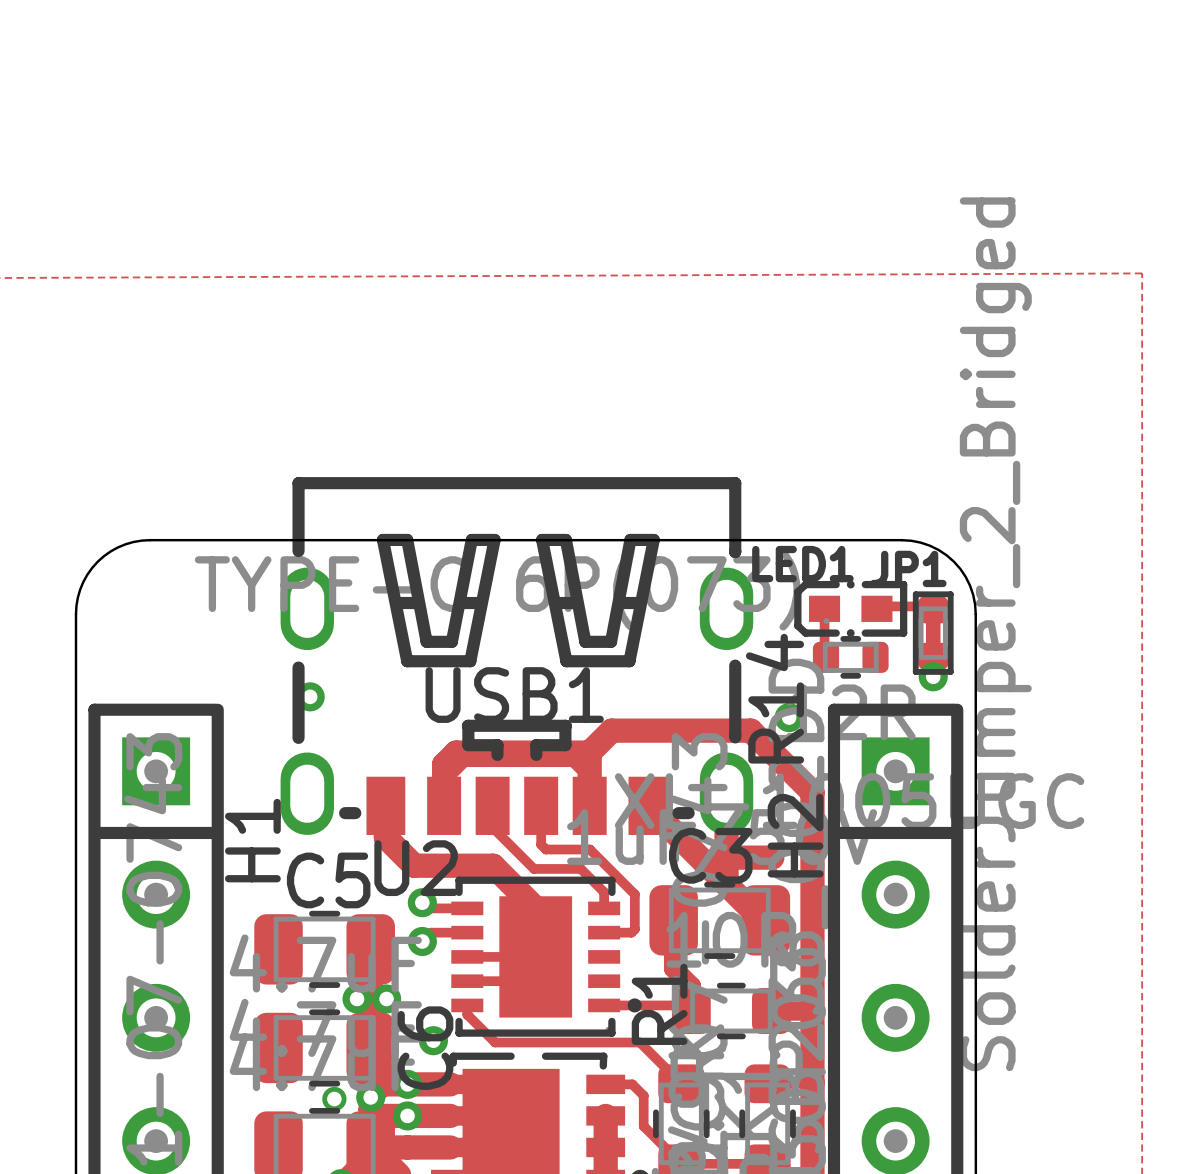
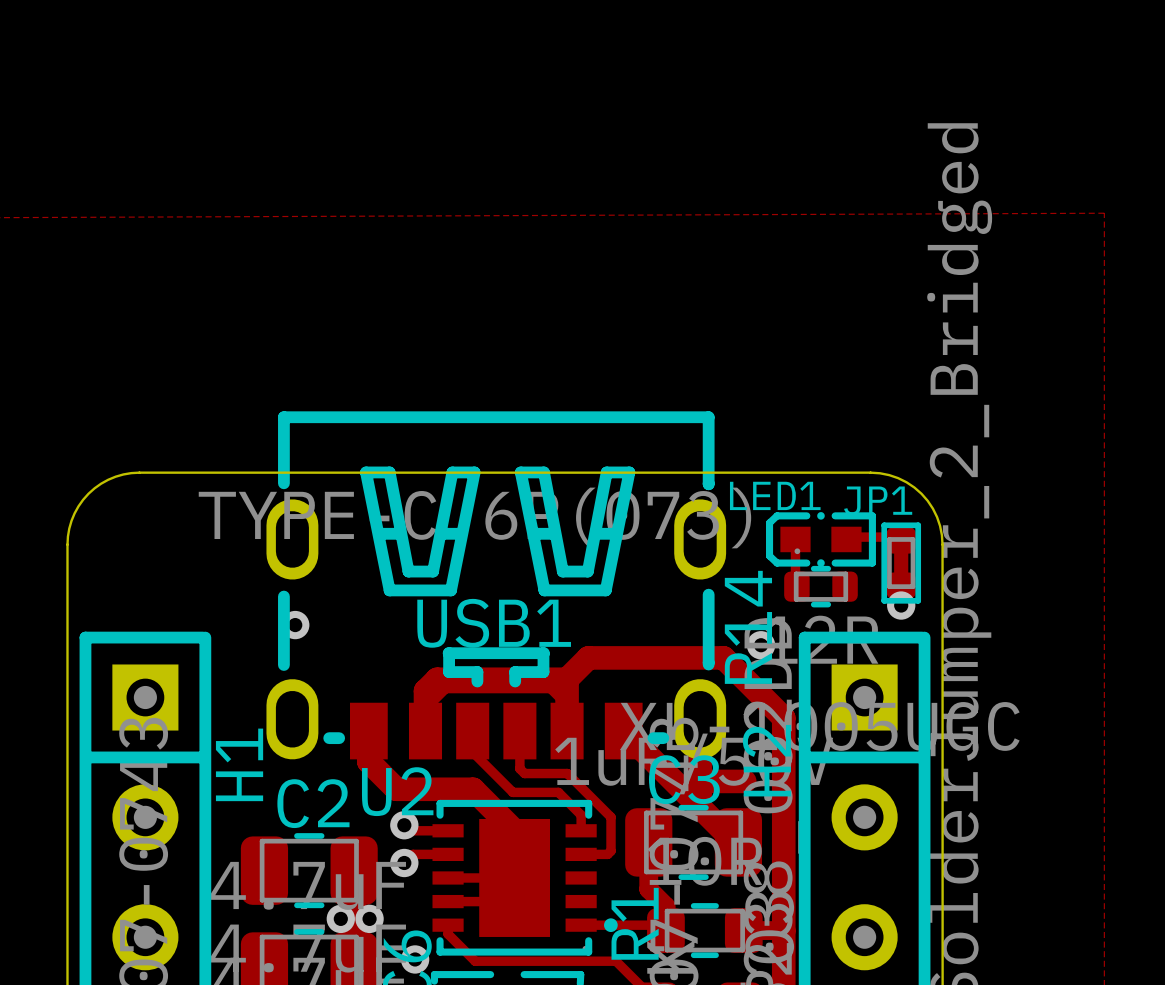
C5 name: C5 (328, 880) -> C2 (313, 803)

